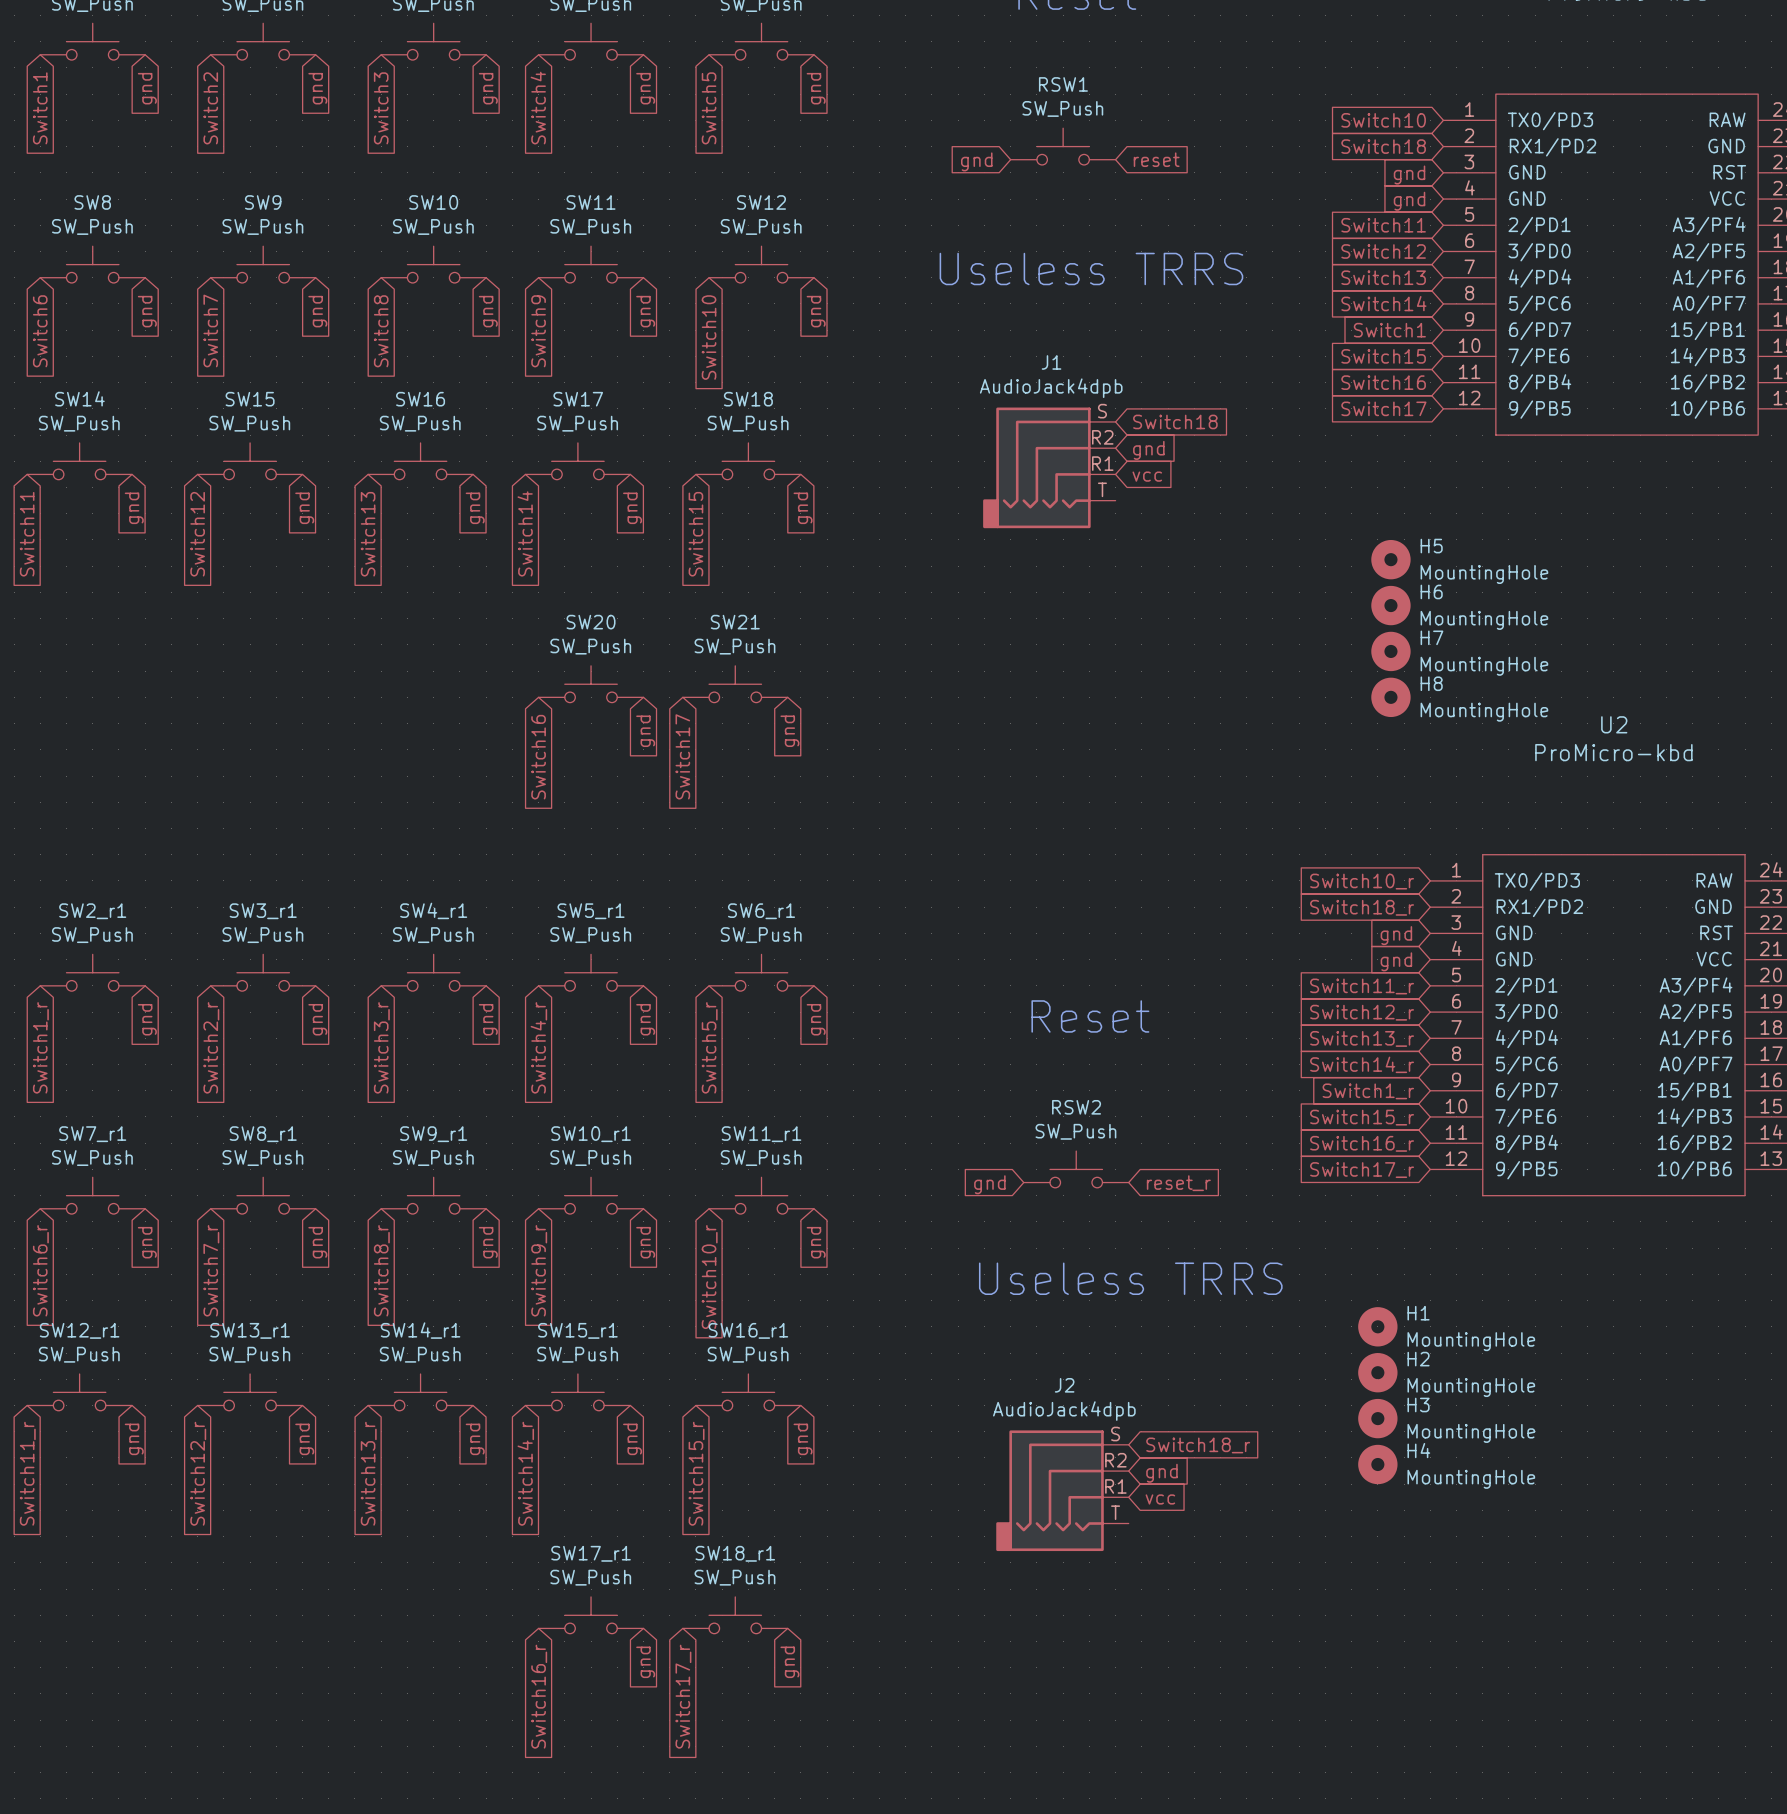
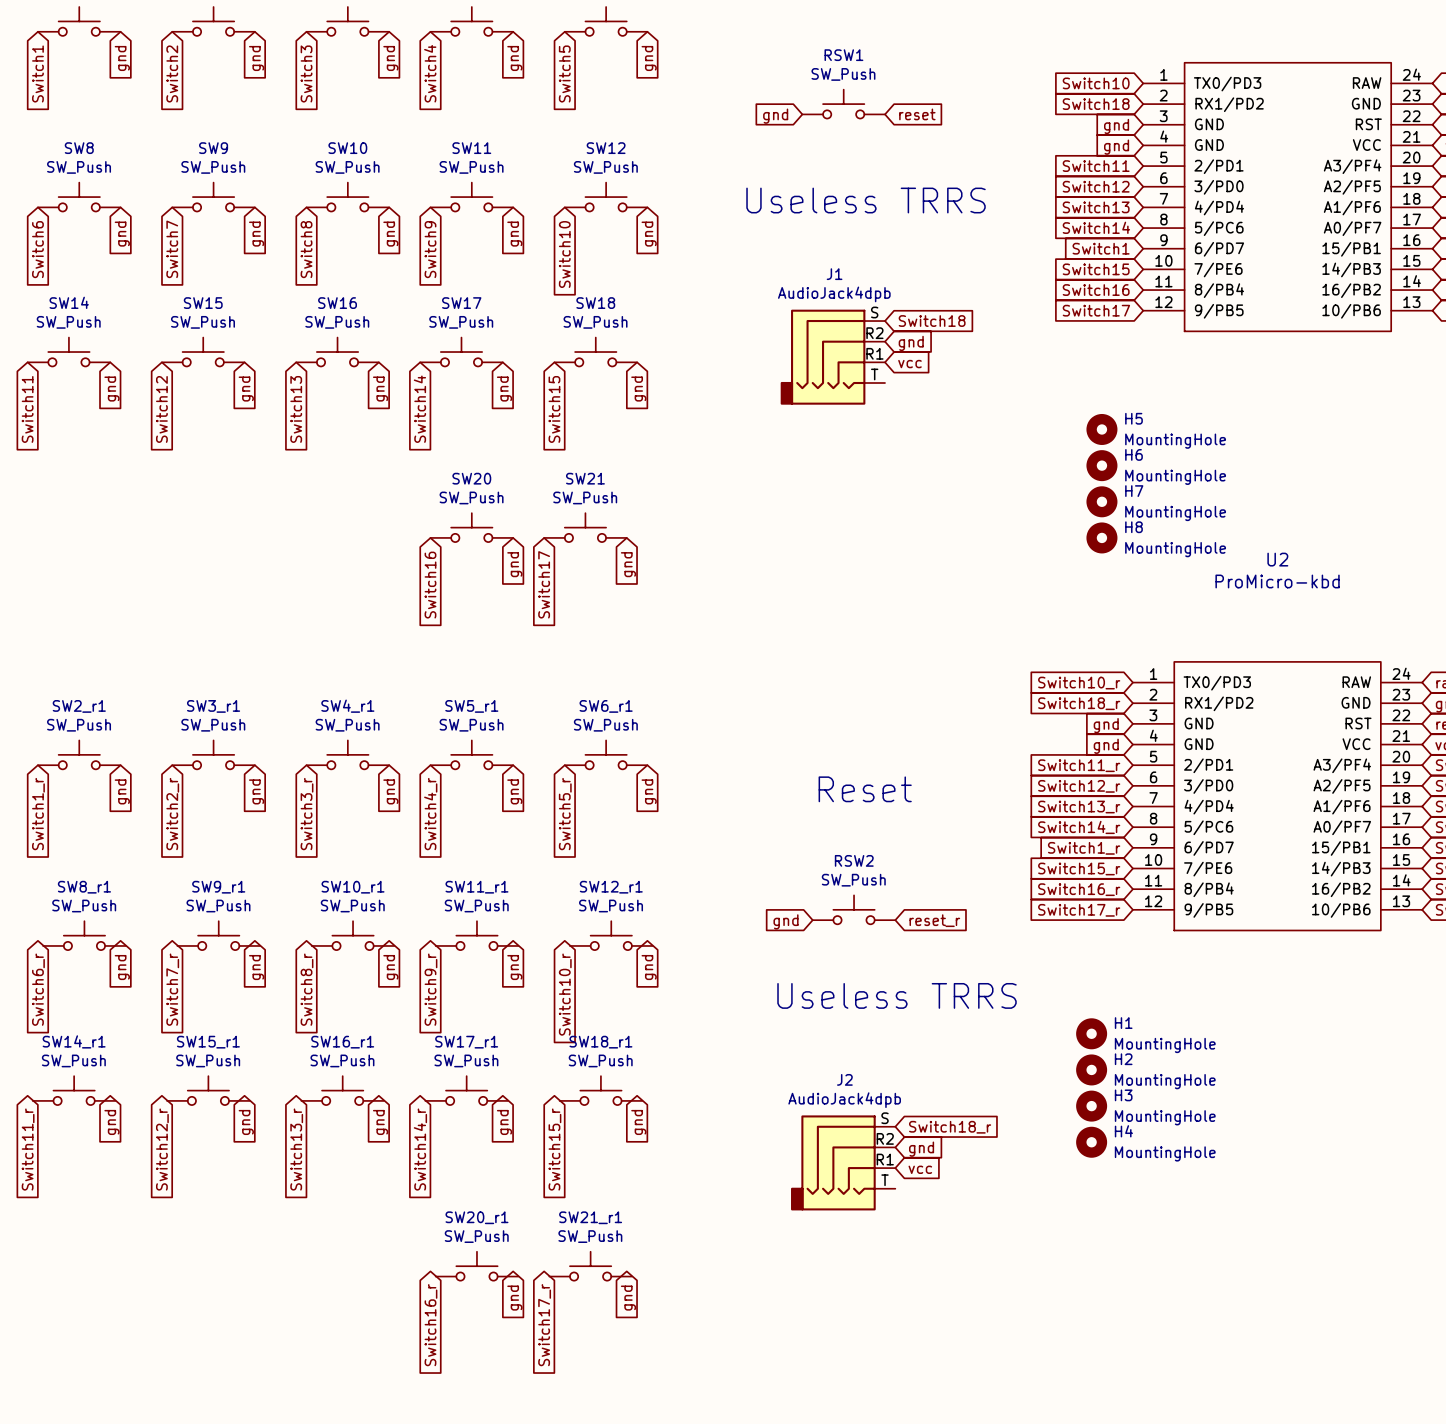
SW7_r1: SW_Push (92, 1195) -> none
SW8_r1 position: (263, 1195) -> (84, 935)
SW9_r1 position: (433, 1195) -> (218, 935)
SW10_r1 position: (591, 1195) -> (353, 935)
SW11_r1 position: (761, 1195) -> (476, 935)
SW12_r1 position: (79, 1392) -> (611, 935)
SW13_r1: SW_Push (250, 1392) -> none
SW14_r1 position: (420, 1392) -> (74, 1090)
SW15_r1 position: (577, 1392) -> (208, 1090)
SW16_r1 position: (748, 1392) -> (342, 1090)
SW17_r1 position: (591, 1615) -> (466, 1090)
SW18_r1 position: (735, 1615) -> (600, 1090)
SW20_r1: none -> SW_Push (476, 1266)
SW21_r1: none -> SW_Push (590, 1266)

